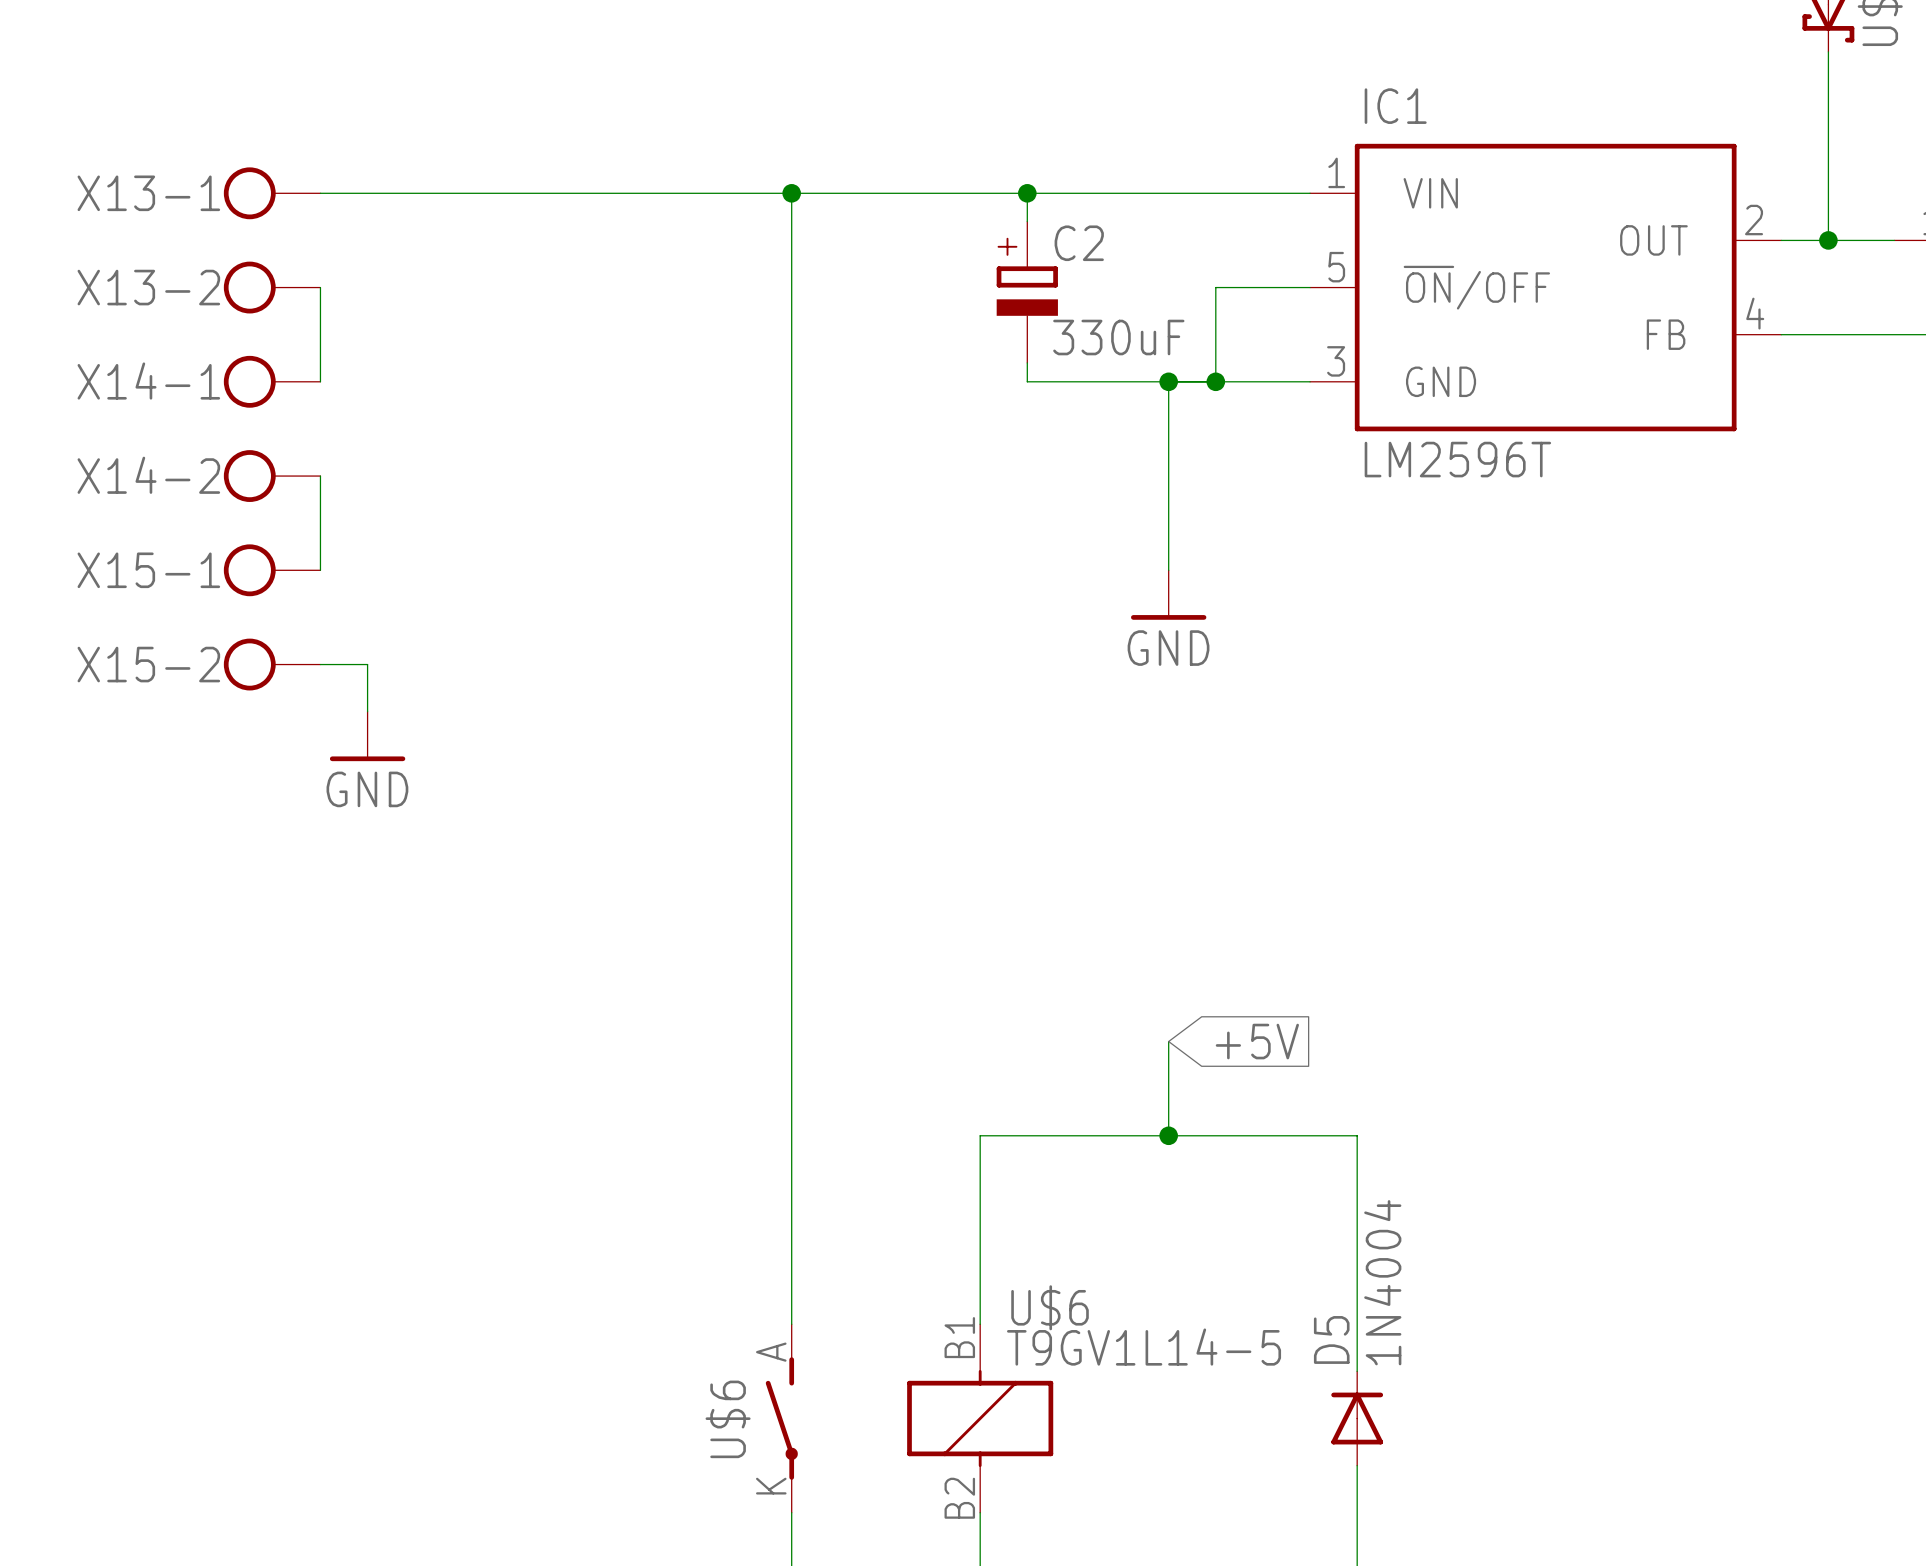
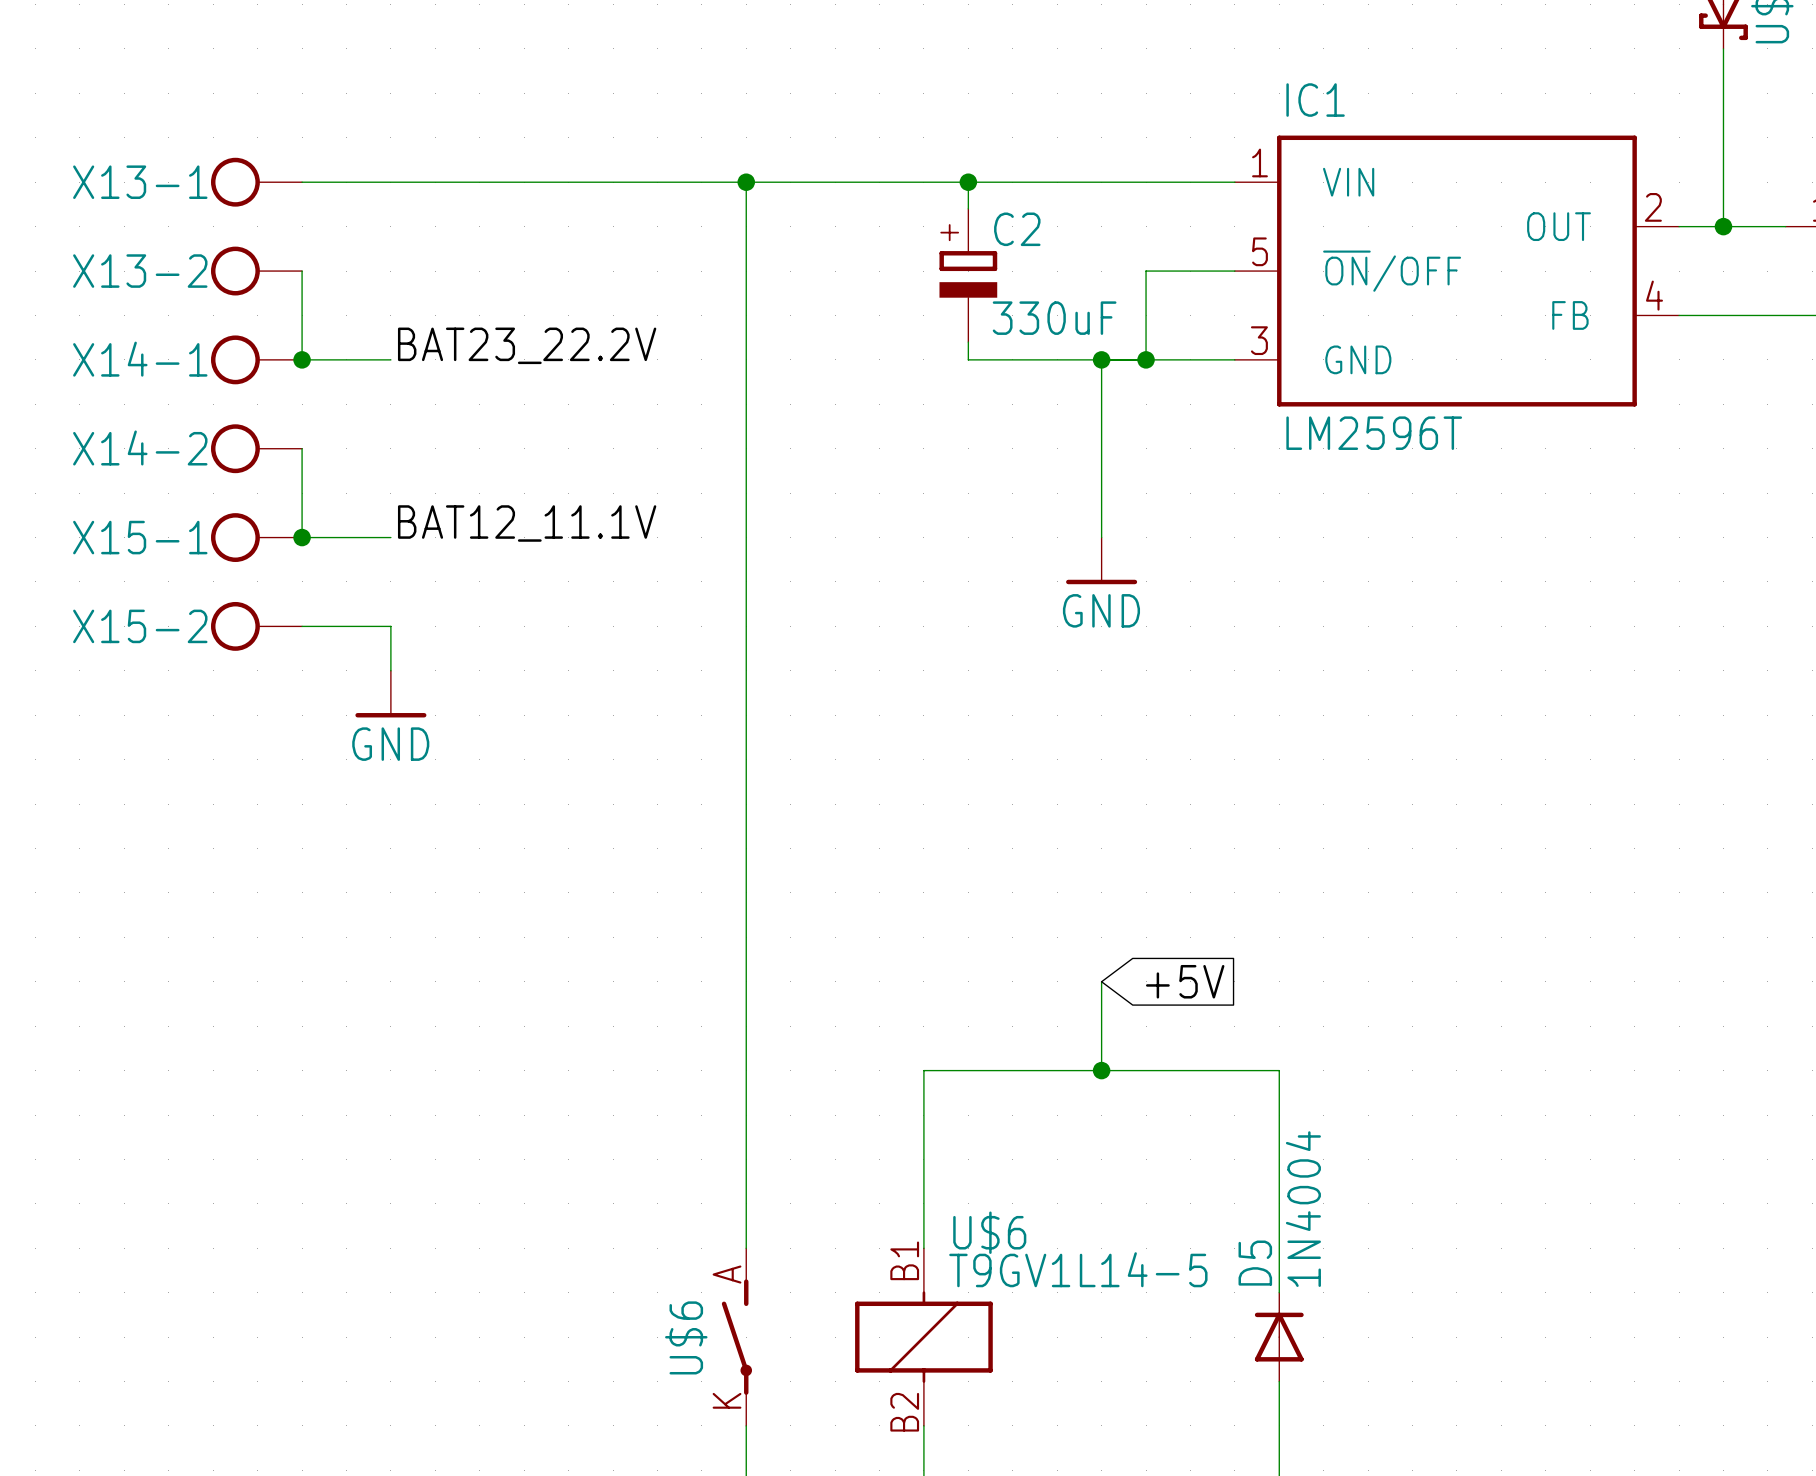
label: none -> BAT23_22.2V (527, 345)
wire: none -> (302, 359) (390, 359)
junction: none -> (302, 359)
label: none -> BAT12_11.1V (527, 523)
wire: none -> (302, 537) (390, 537)
junction: none -> (302, 537)
wire: (367, 664) (367, 711) -> (346, 626) (390, 626) (390, 670)
power symbol position: GND (367, 736) -> GND (390, 694)

